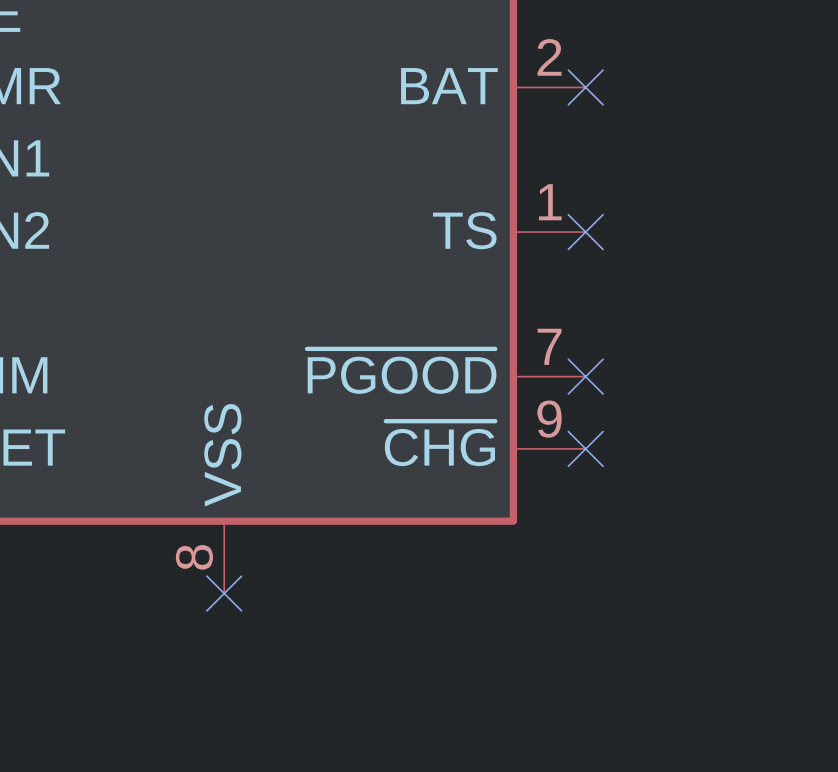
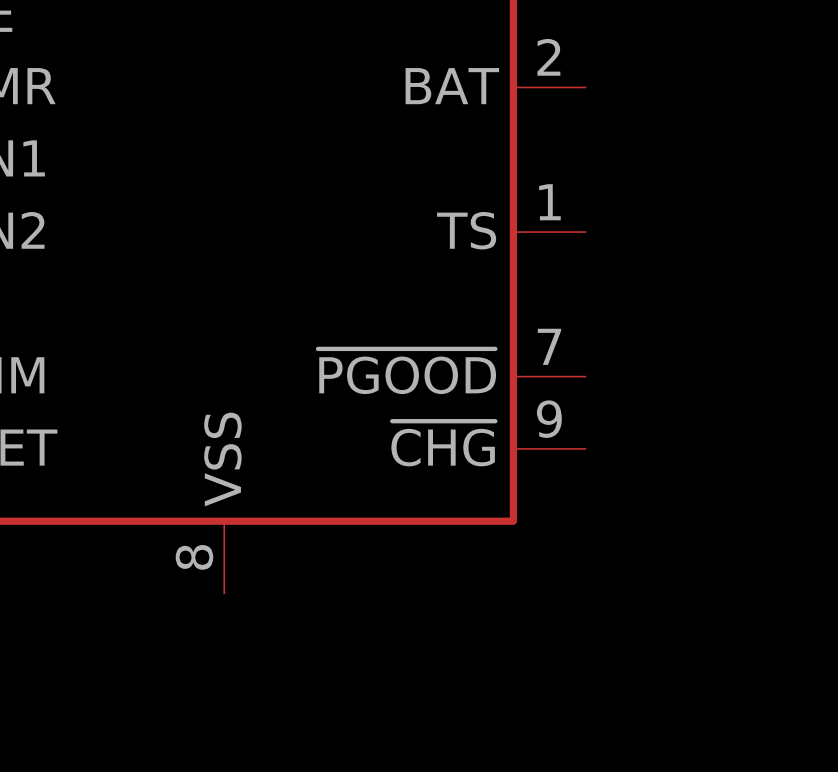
no-connect mark: (585, 87) -> none
no-connect mark: (585, 232) -> none
no-connect mark: (585, 376) -> none
no-connect mark: (585, 448) -> none
no-connect mark: (224, 593) -> none

